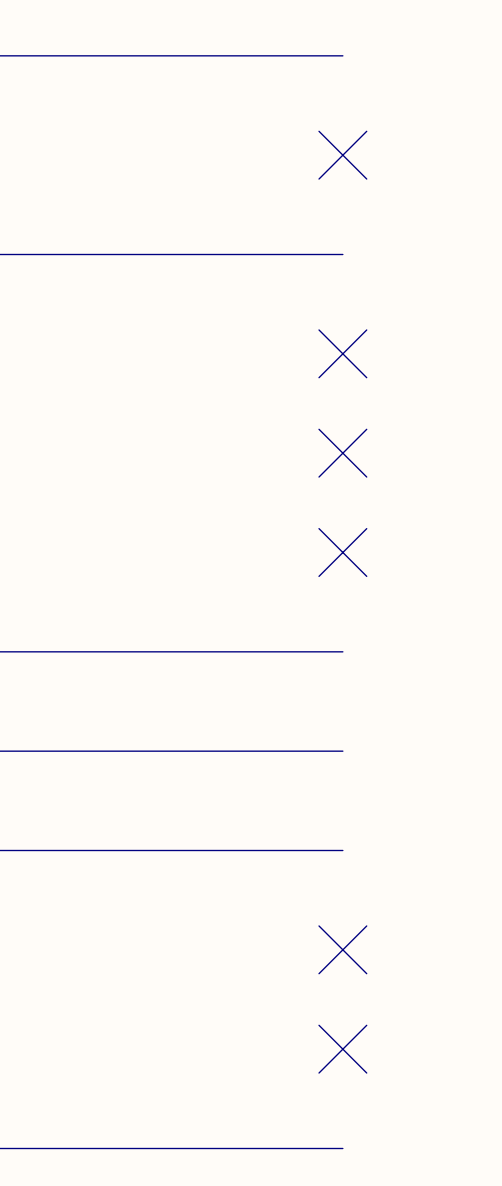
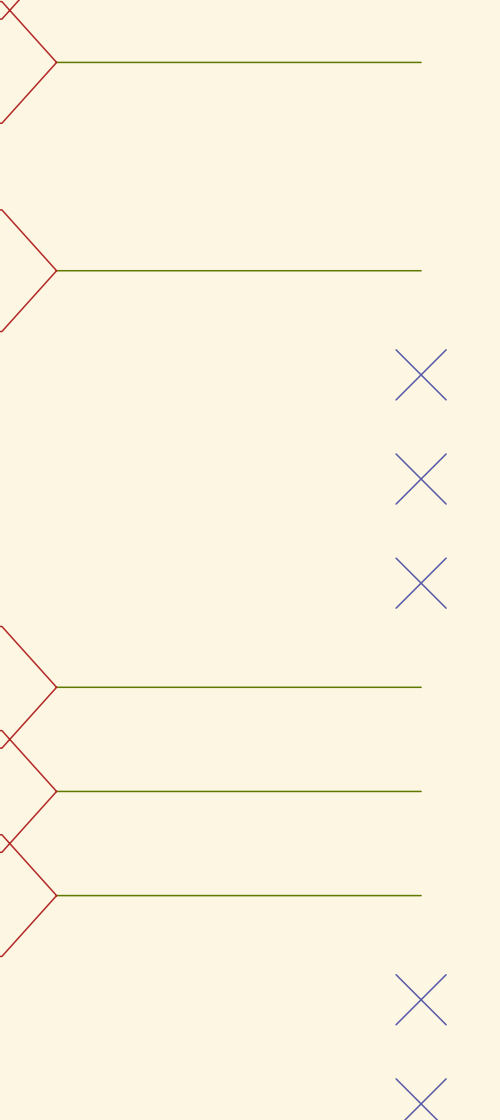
no-connect mark: (342, 155) -> none

